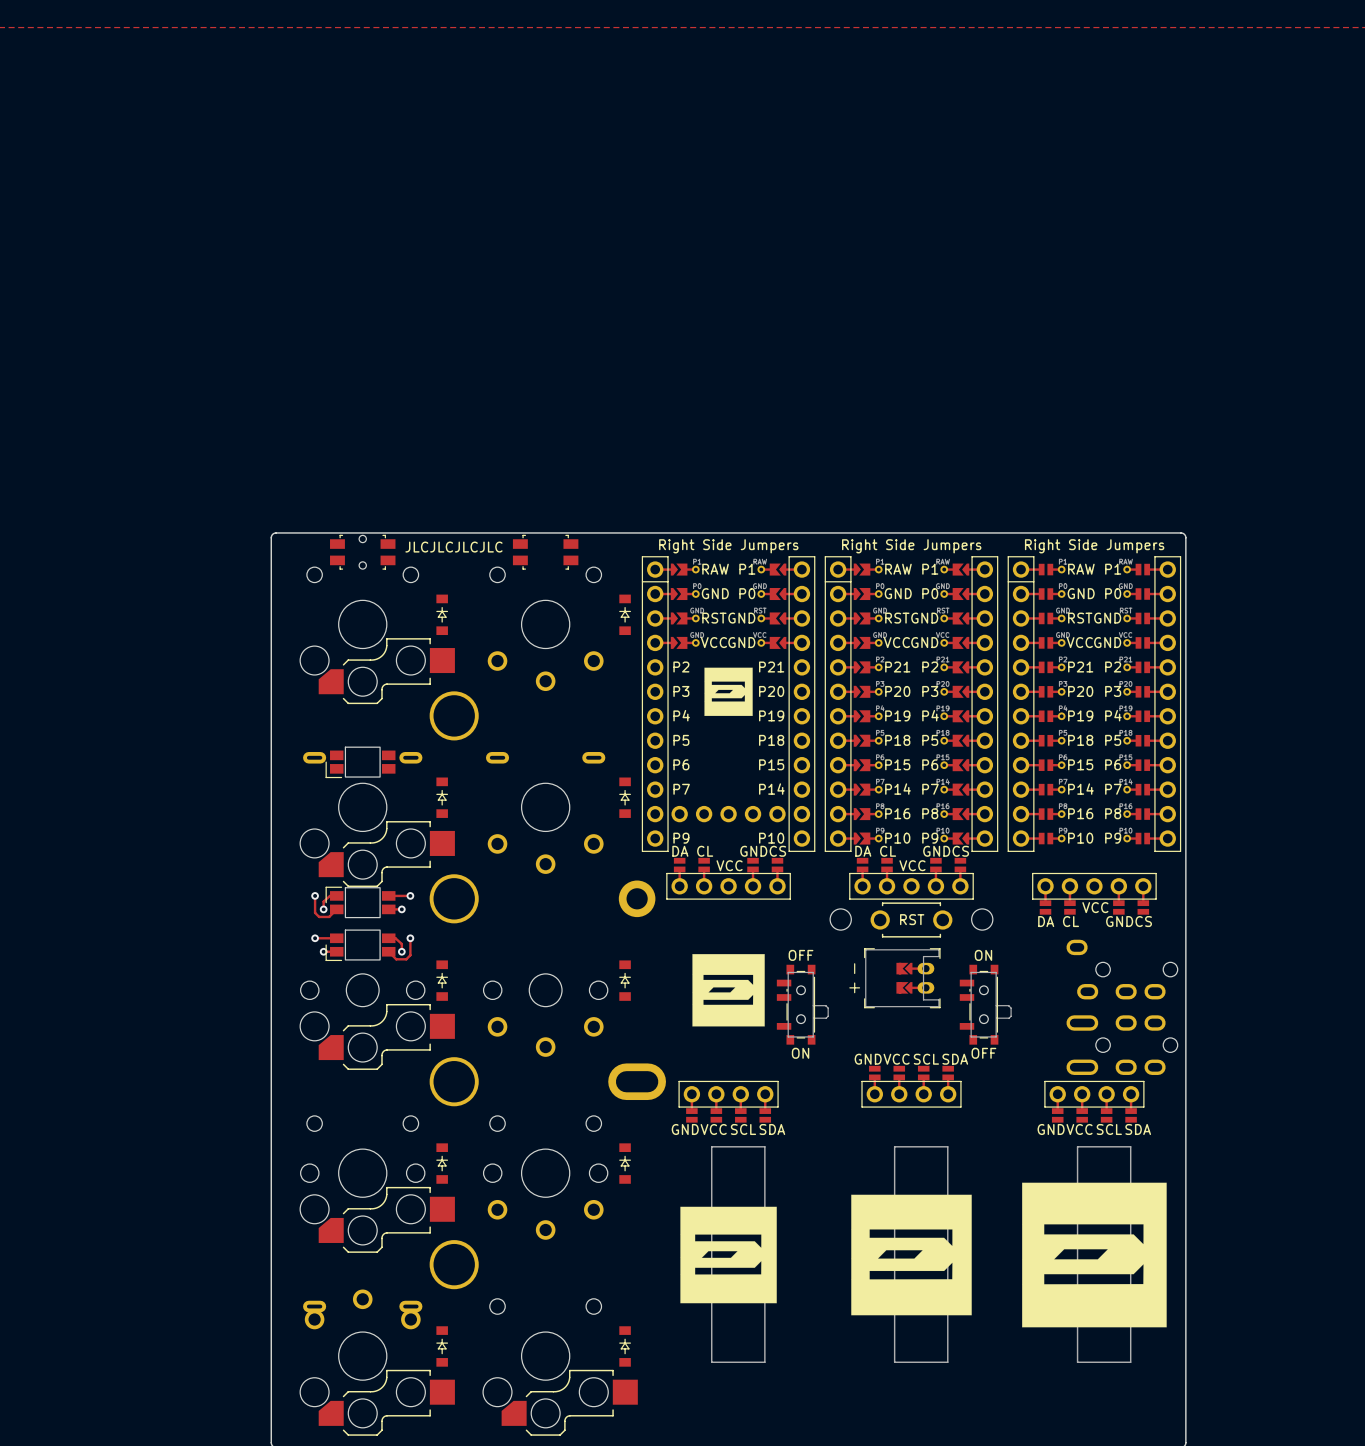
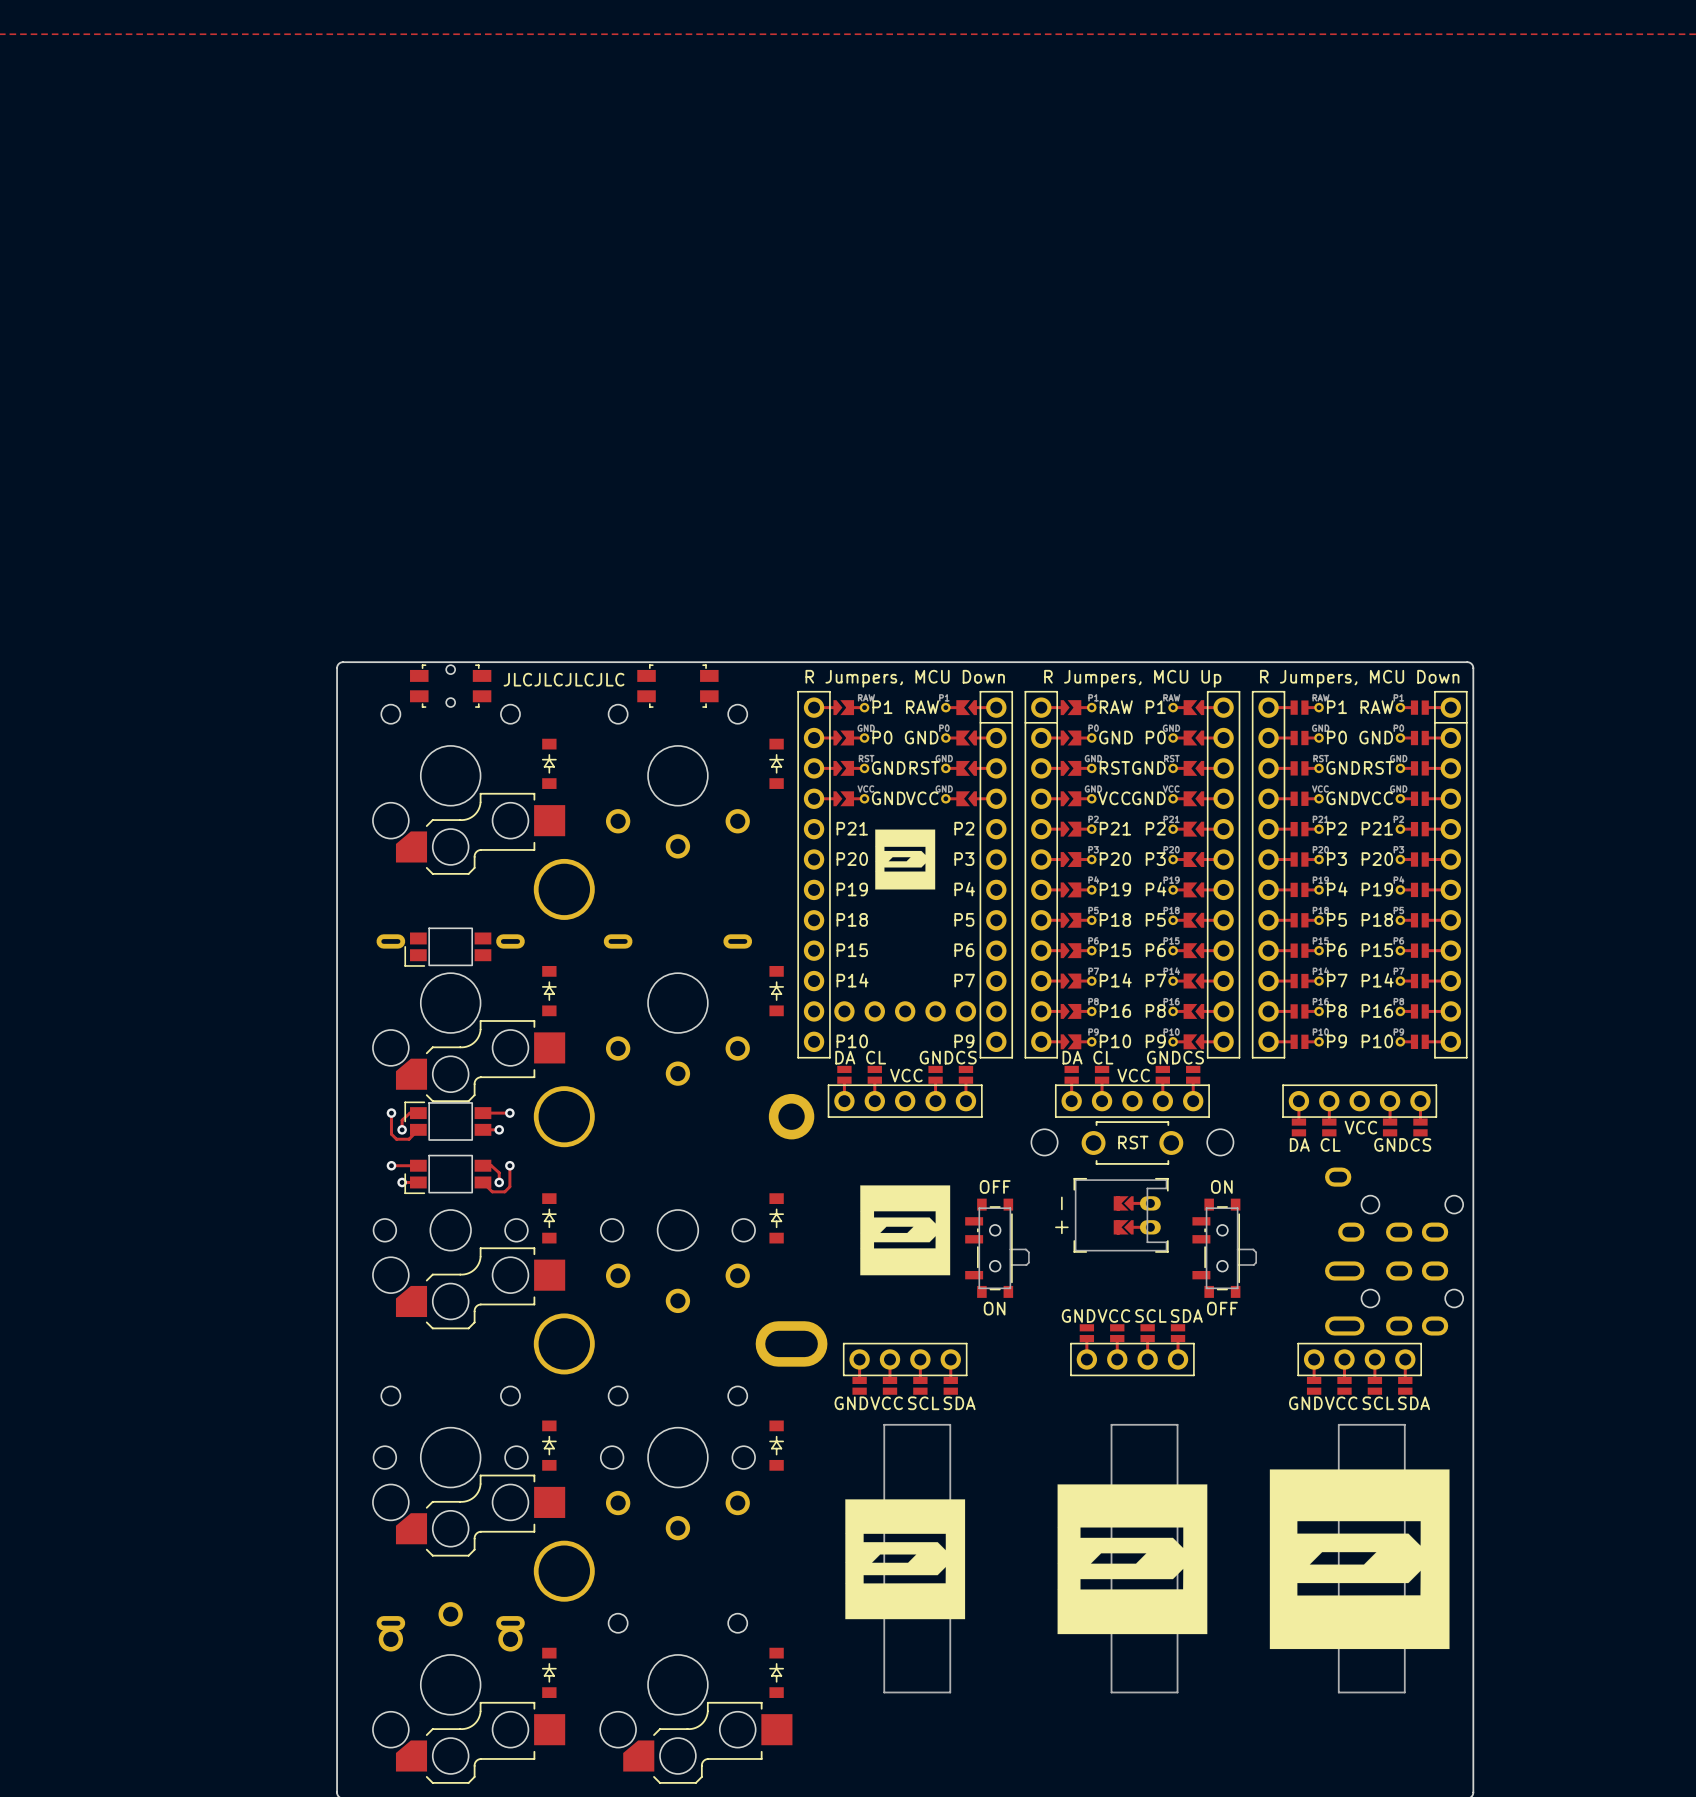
part text: Right Side Jumpers (911, 546) -> R Jumpers, MCU Up (1132, 678)
part footprint: [641, 556, 816, 852] -> [797, 691, 1013, 1059]
part footprint: [1007, 556, 1182, 852] -> [1251, 691, 1468, 1059]

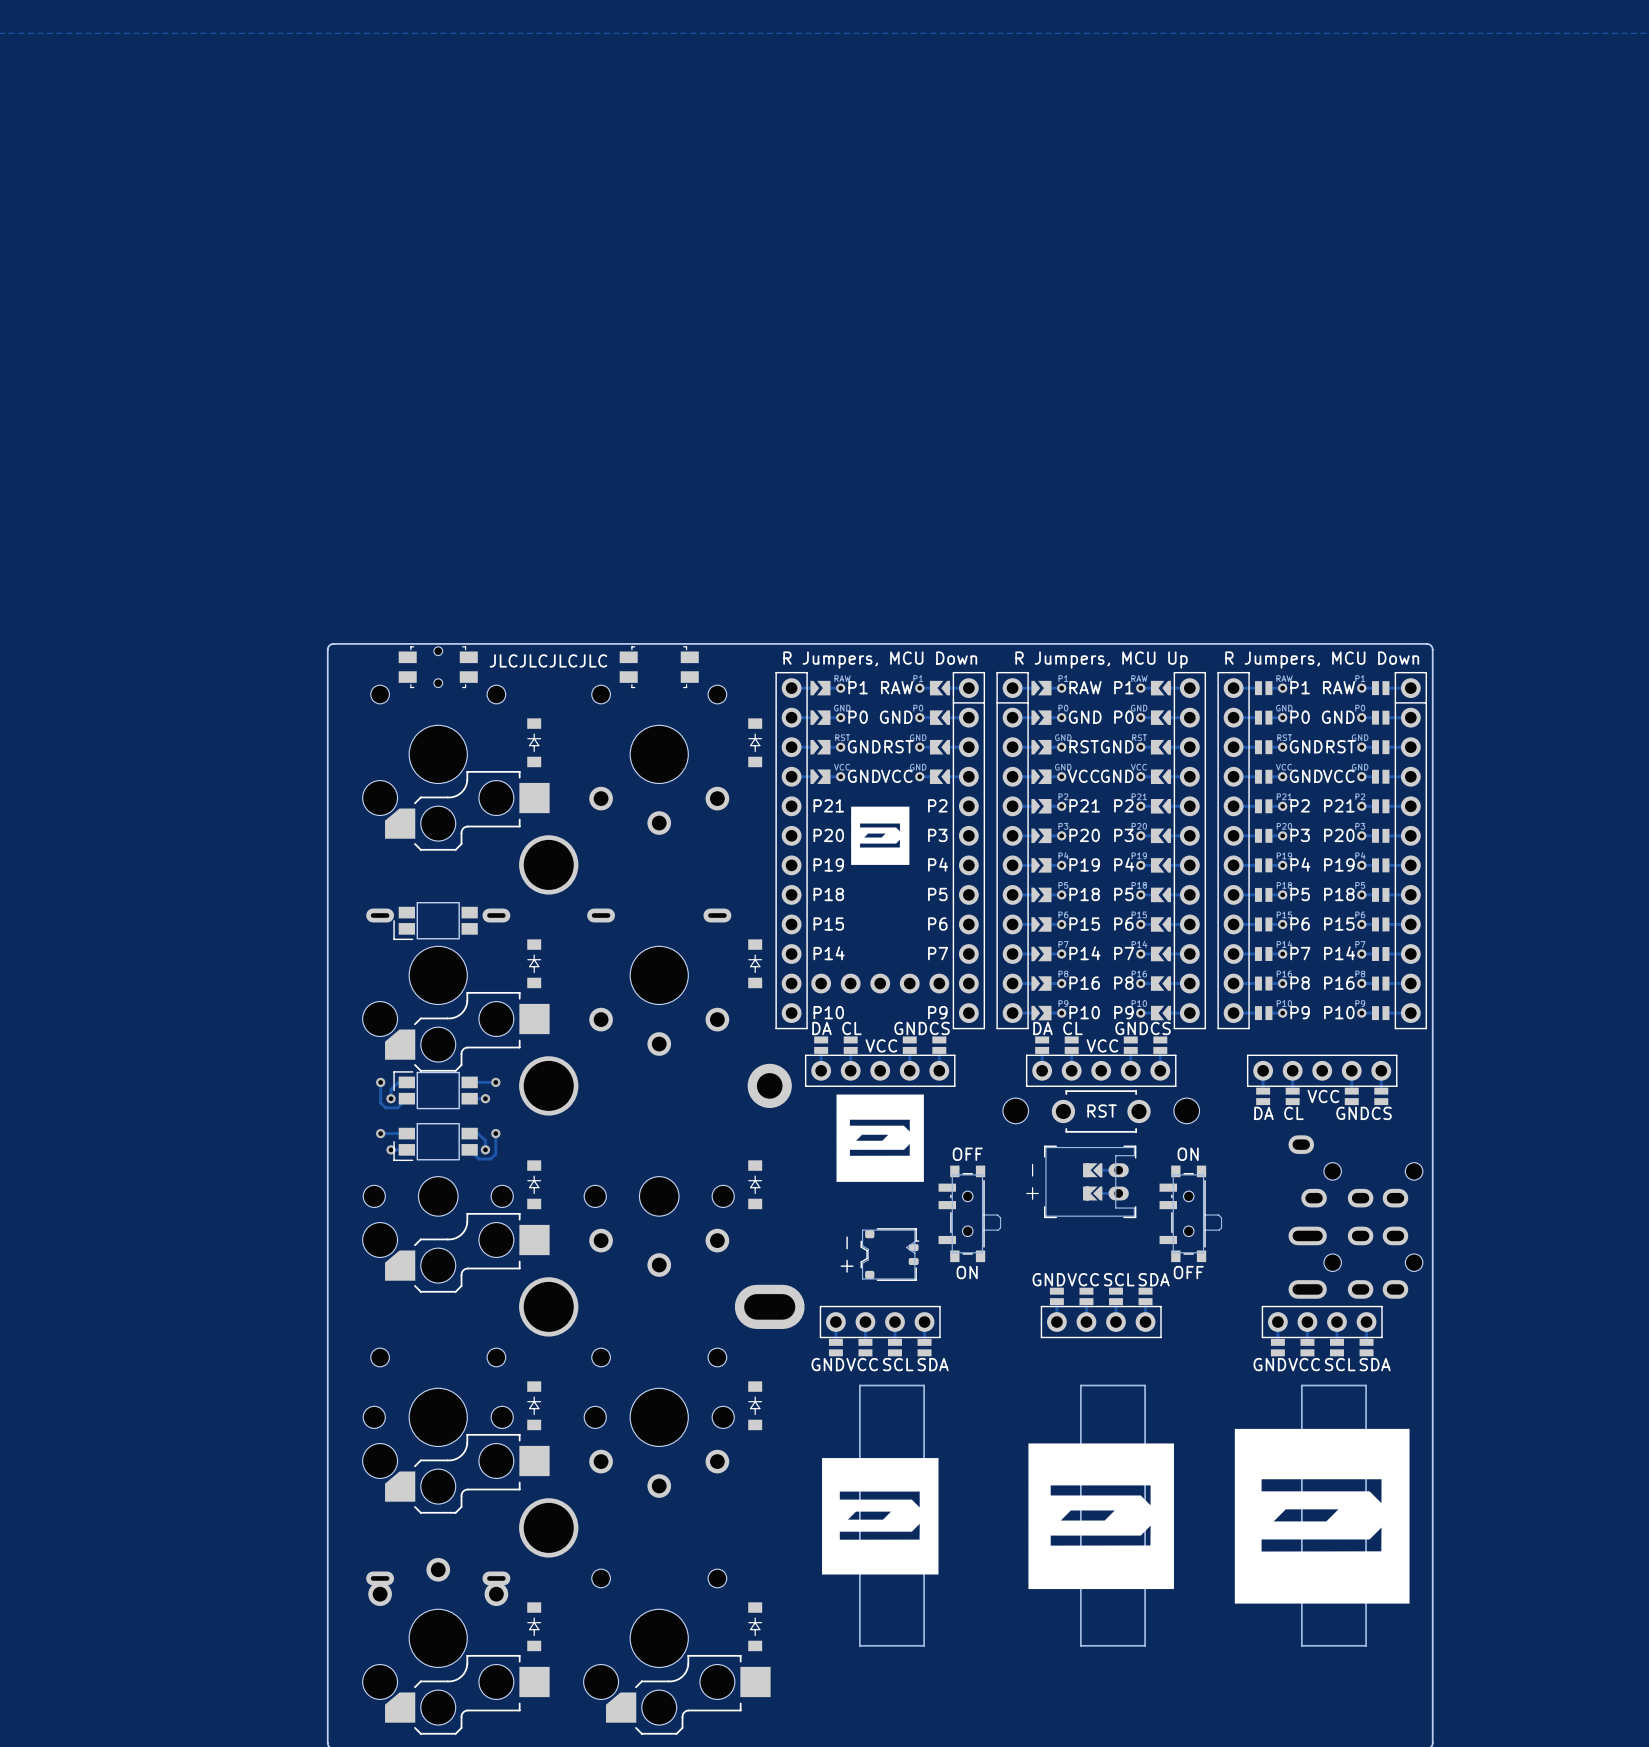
drawing position: (905, 1230) -> (880, 1138)
part: none -> (879, 1254)

